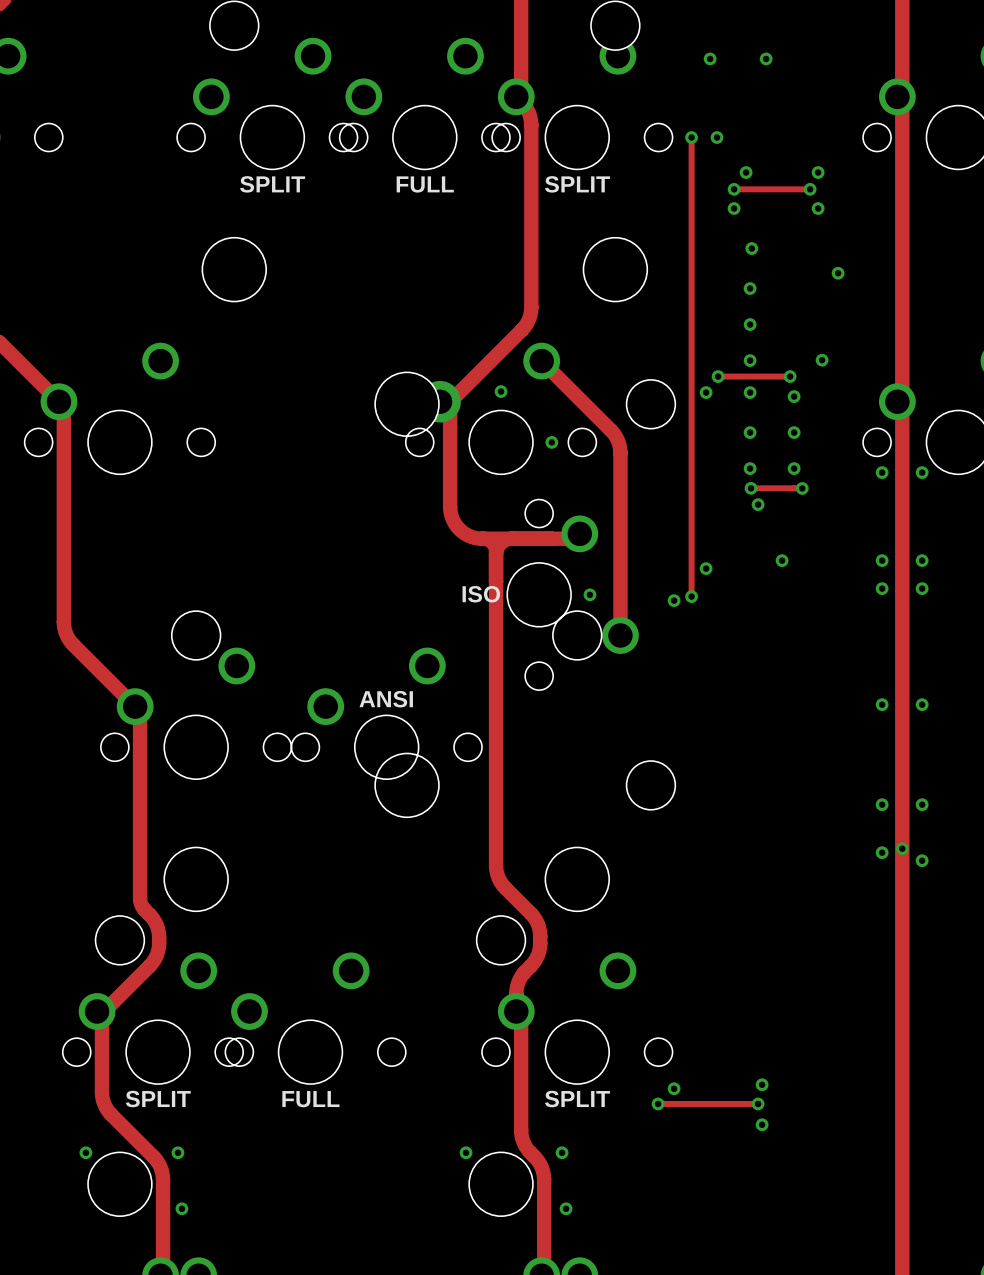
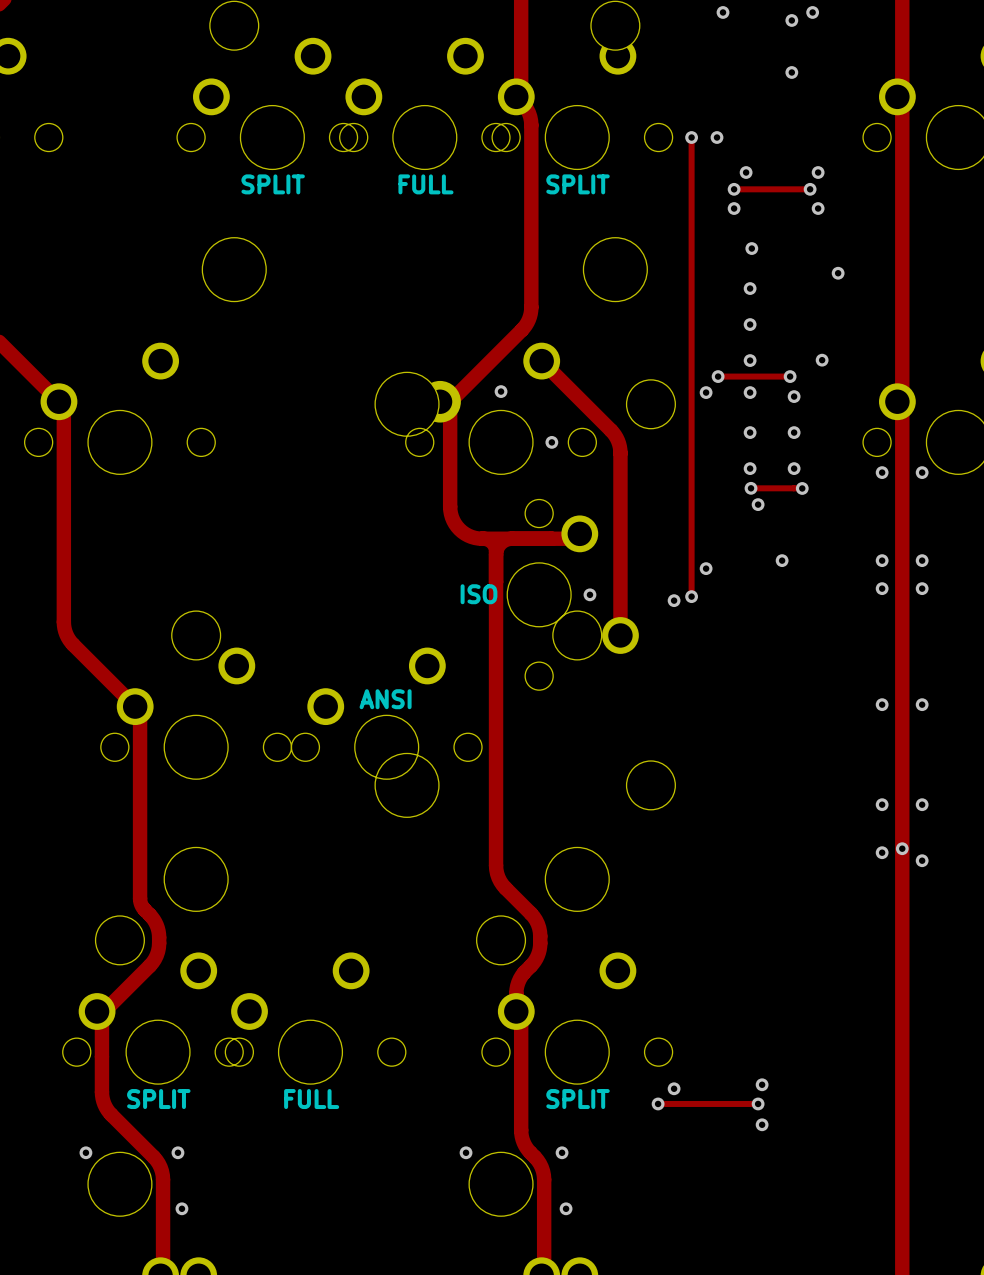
via: none -> (723, 12)
via: none -> (812, 12)
via: none -> (791, 20)
via: (710, 58) -> none
via: (766, 58) -> none
via: none -> (791, 72)

